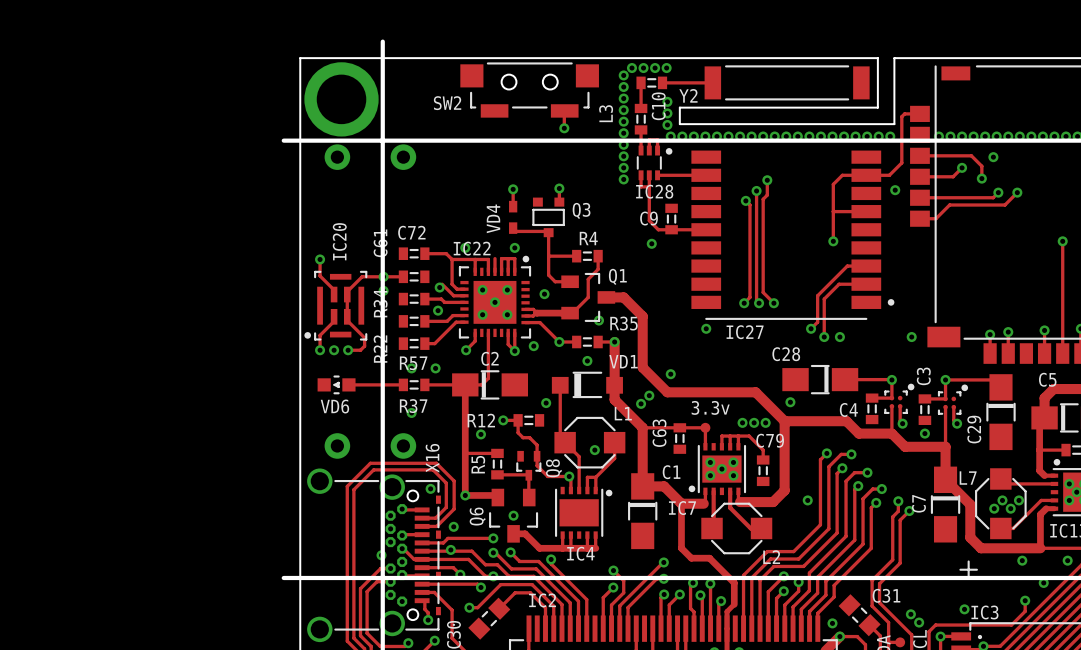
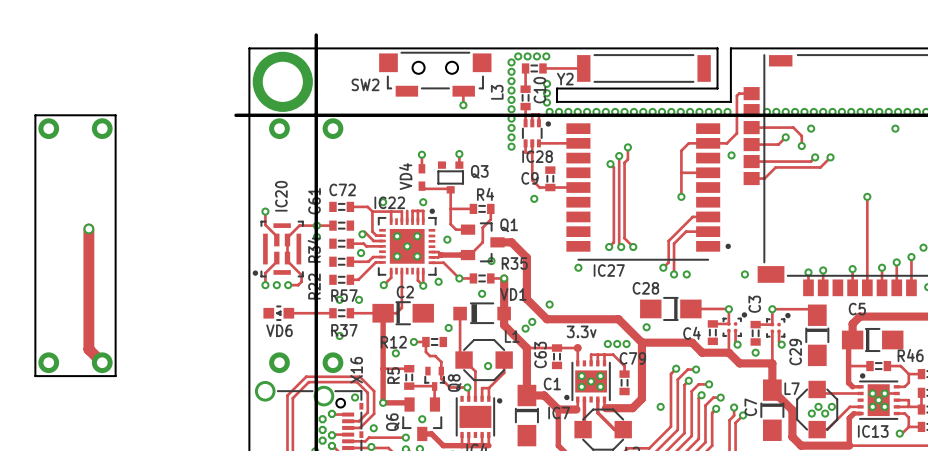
board edge: none -> (35, 115) (115, 115) (115, 376) (35, 376) (35, 115)
via: none -> (48, 128)
via: none -> (102, 128)
track: none -> (88, 228) (88, 349) (102, 362)
via: none -> (88, 228)
via: none -> (48, 362)
via: none -> (102, 362)

